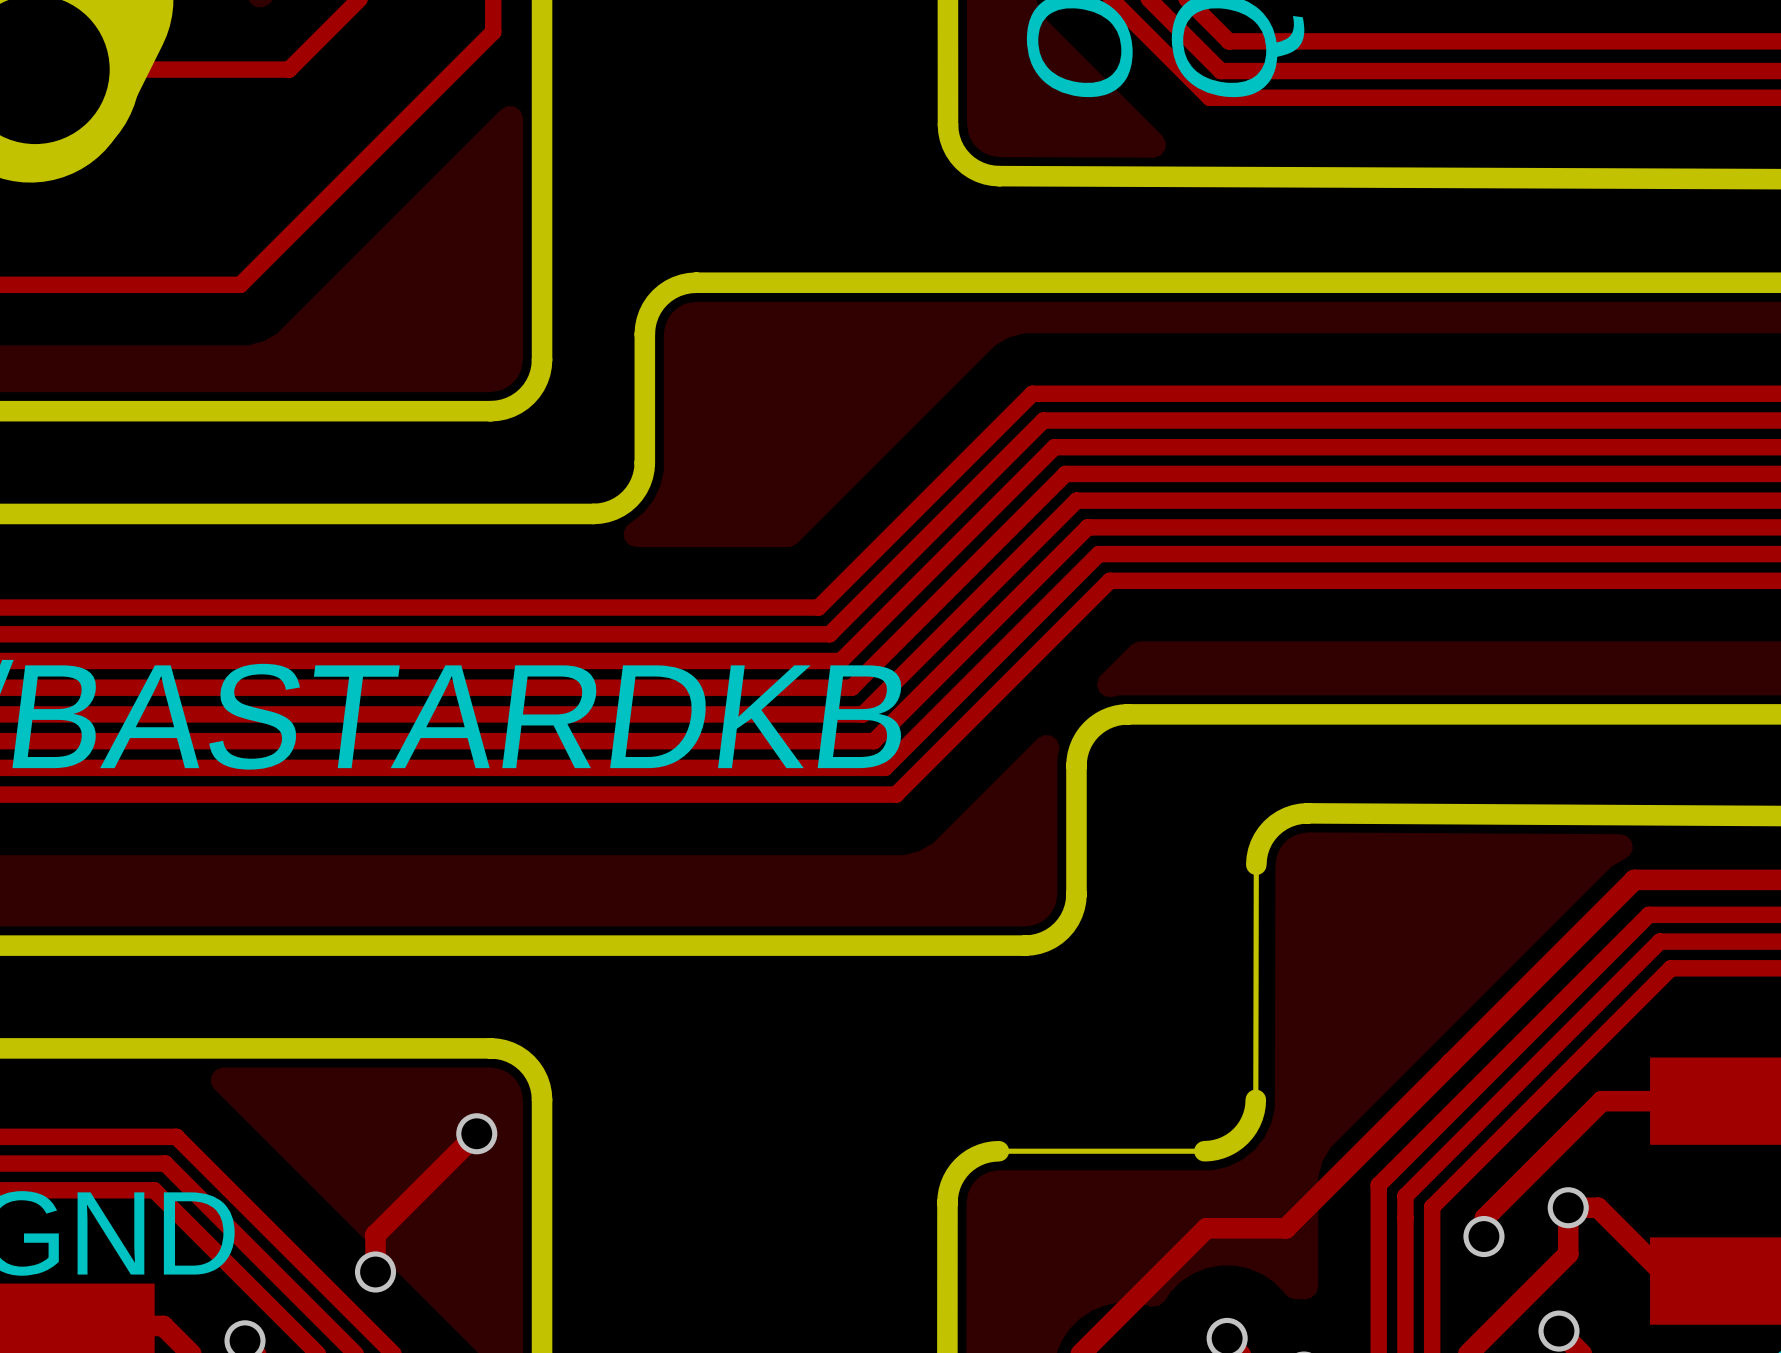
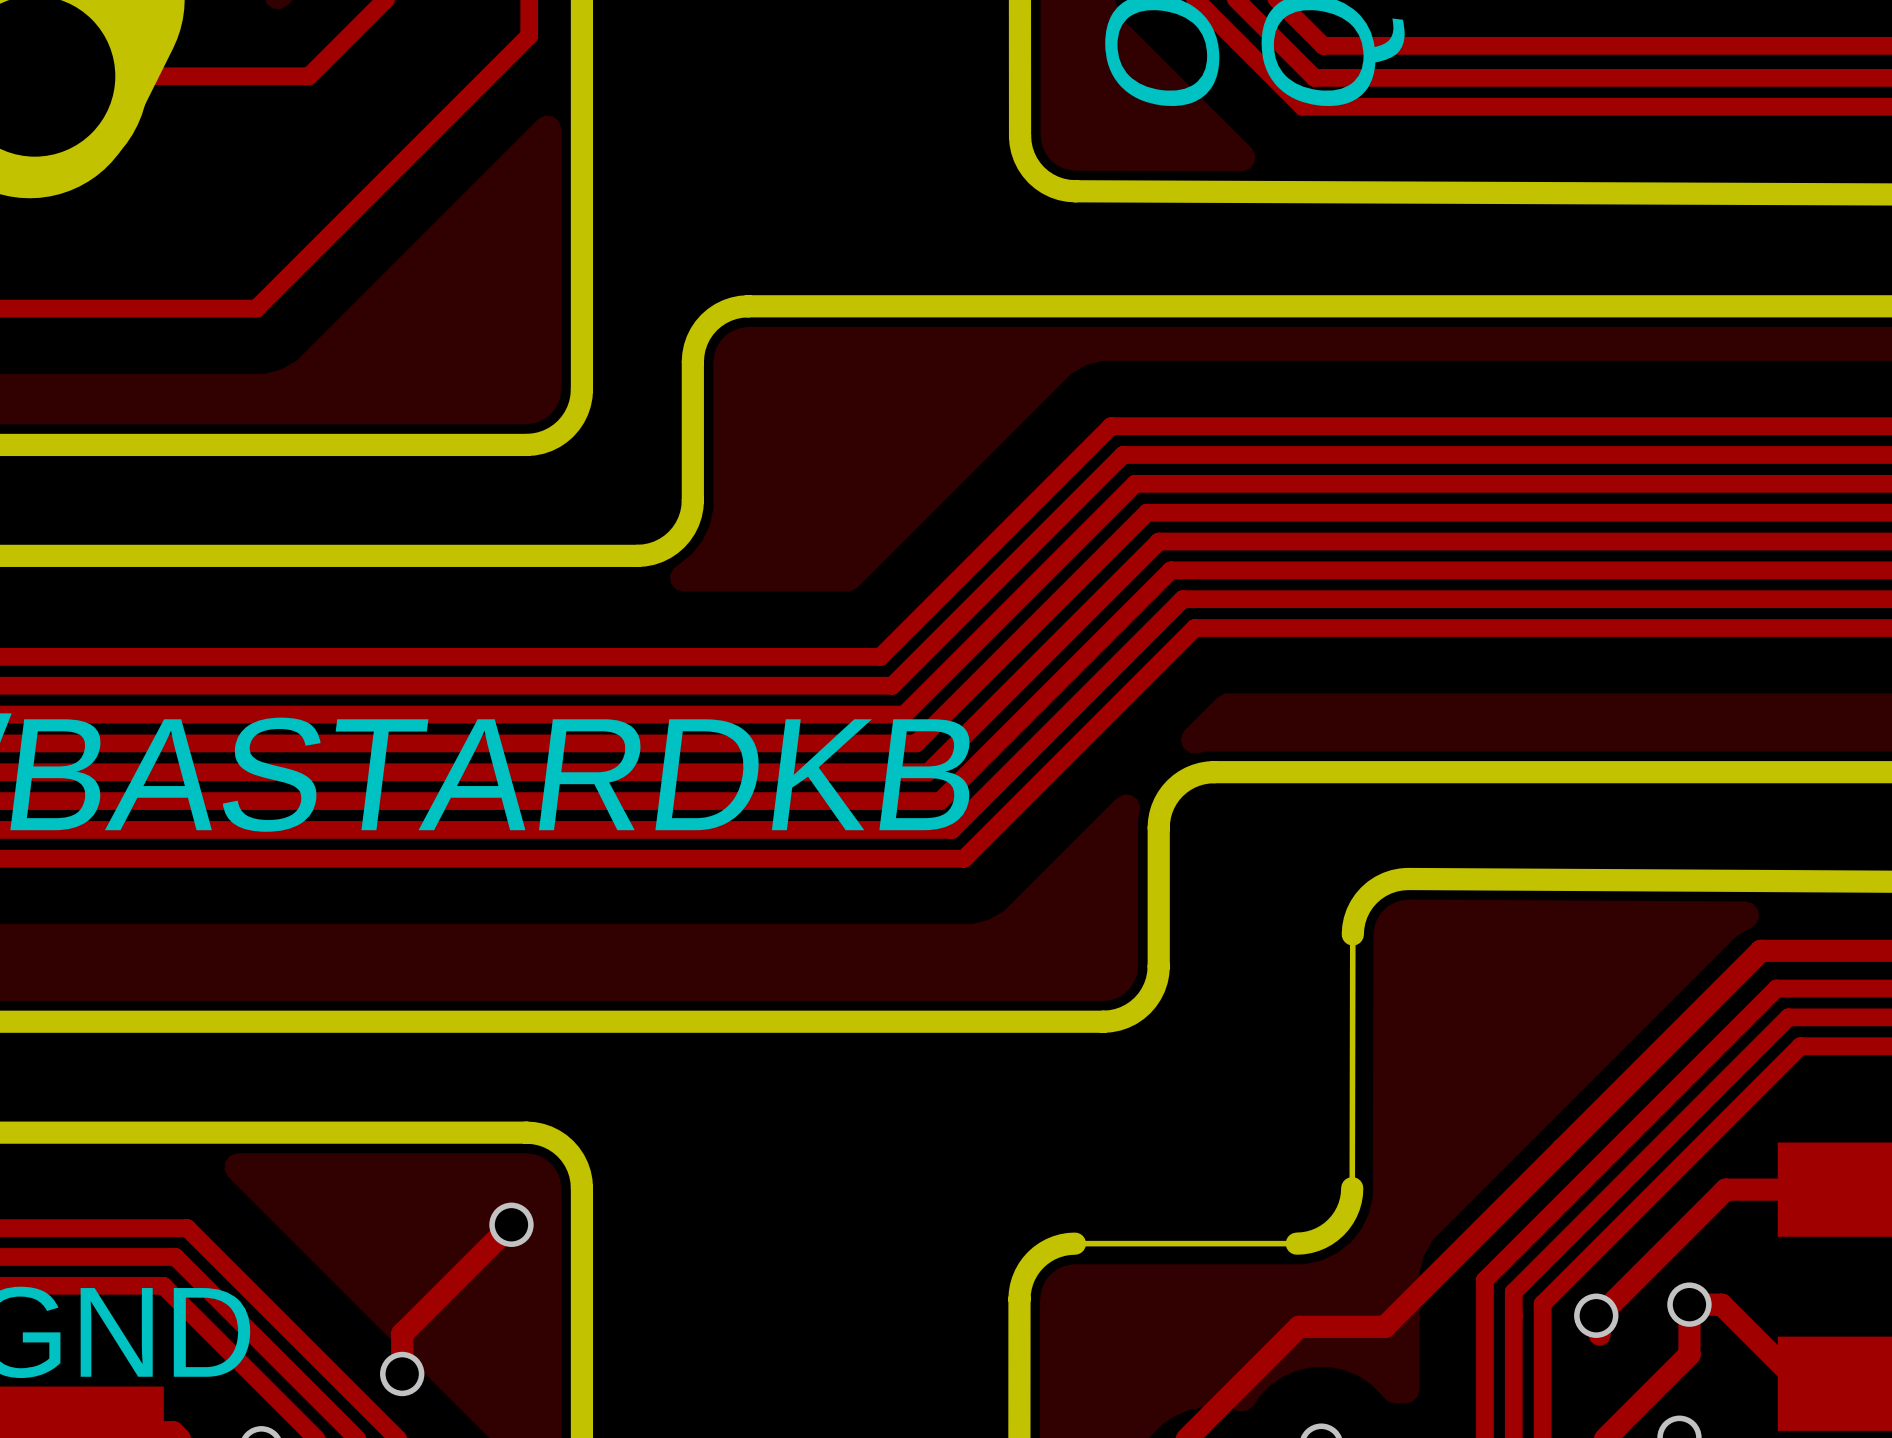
via position: (1483, 1236) -> (1596, 1315)

